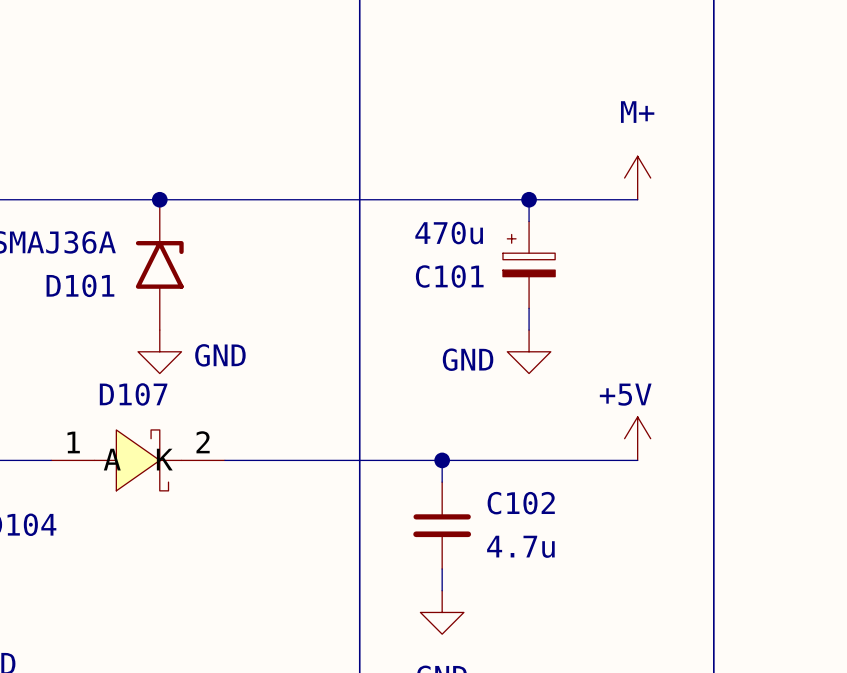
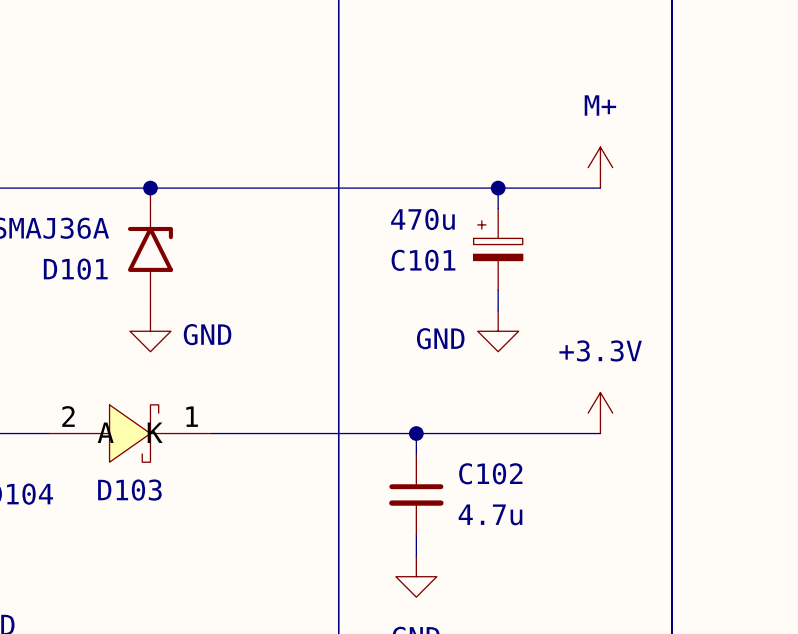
power symbol: +5V (637, 438) -> +3.3V (600, 413)
D107: (138, 460) -> none
D103: none -> (130, 433)

